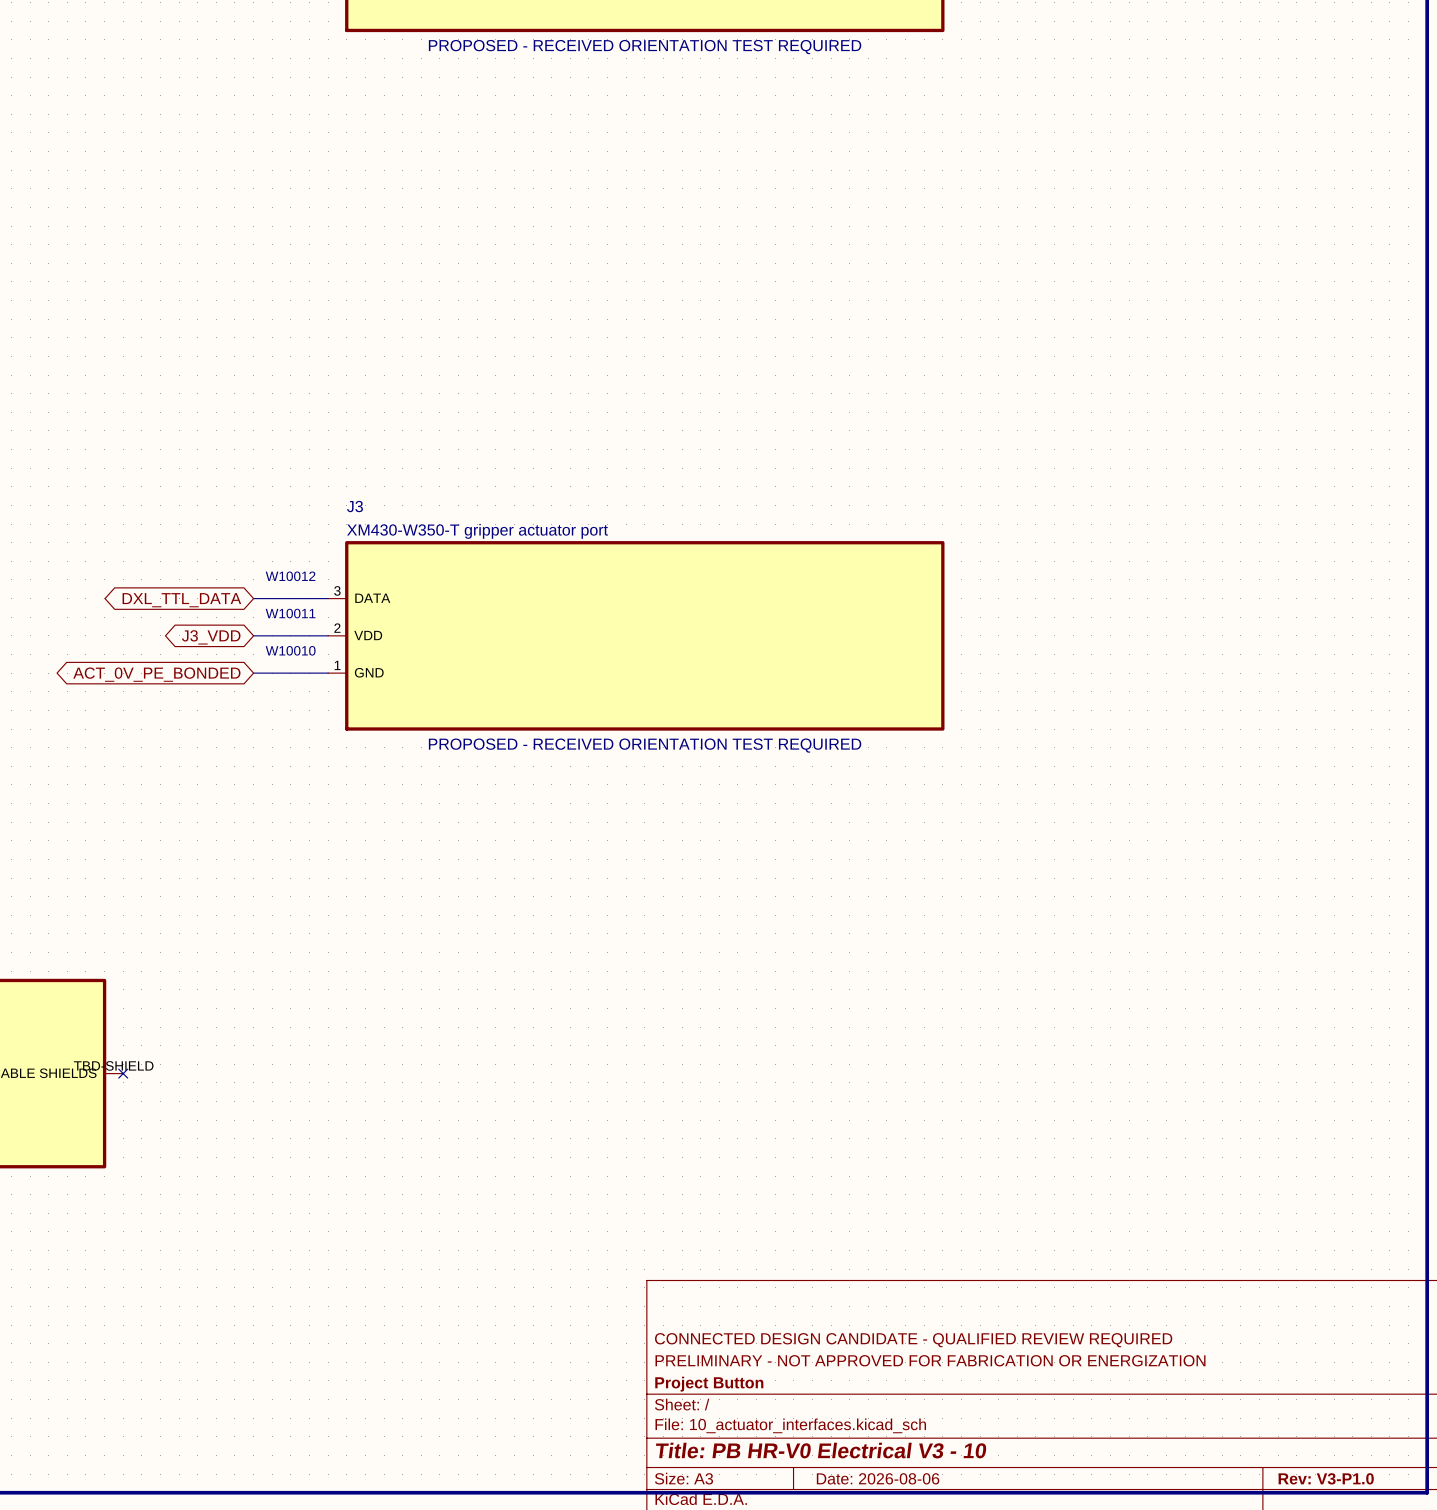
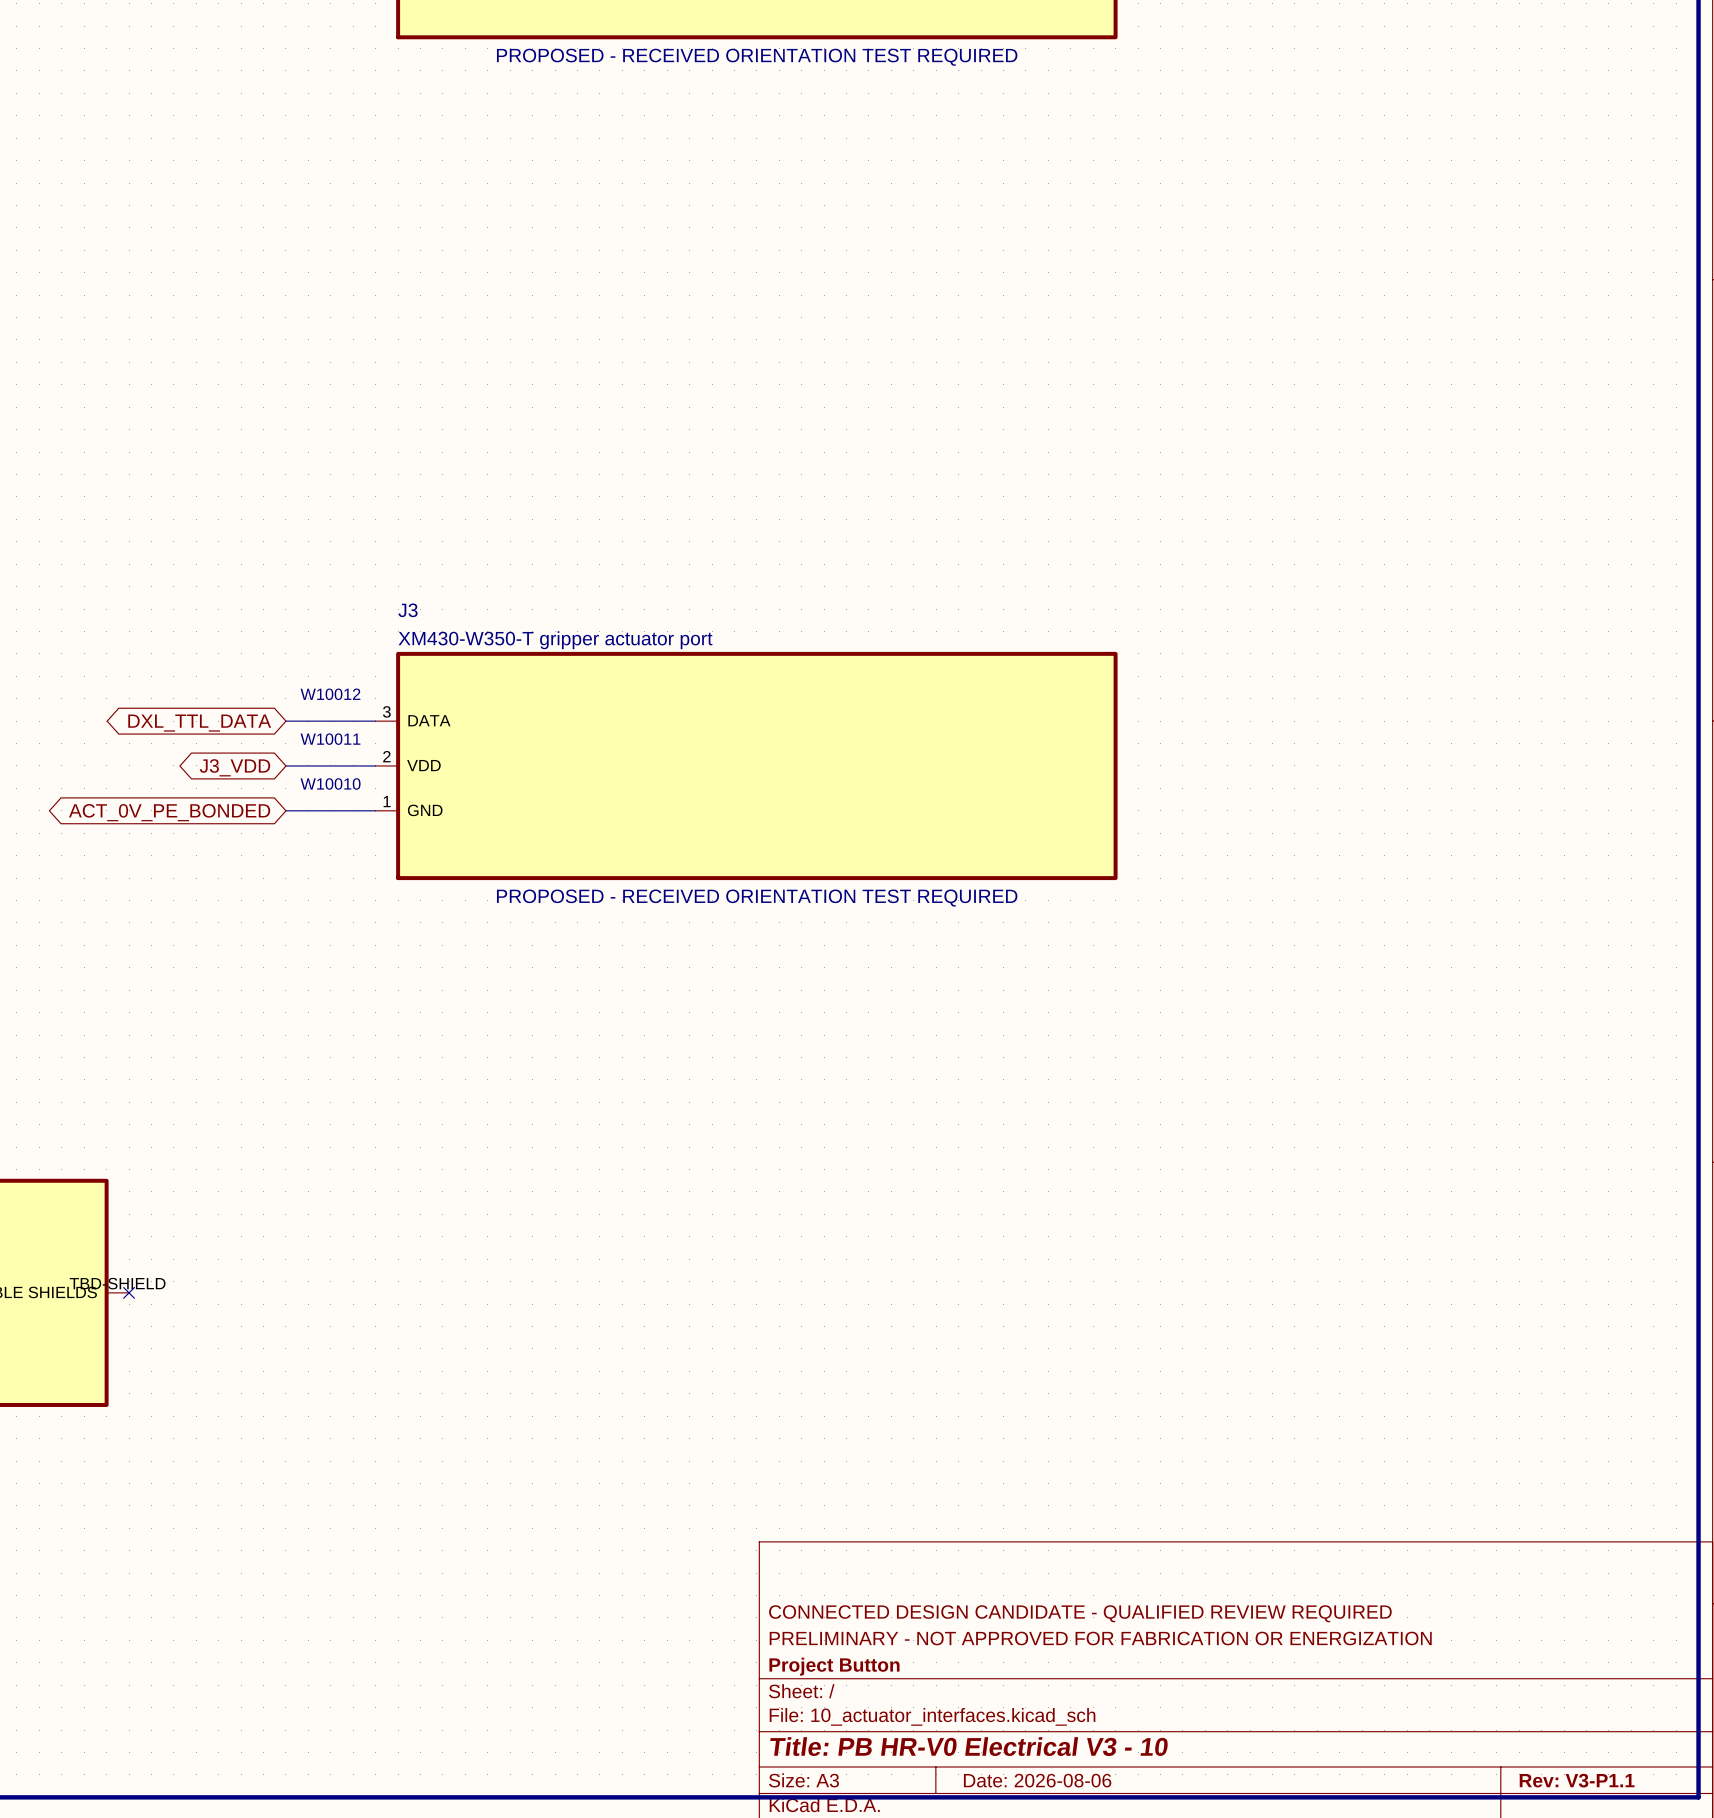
title block: Rev: V3-P1.0 (1326, 1478) -> Rev: V3-P1.1 (1577, 1780)

